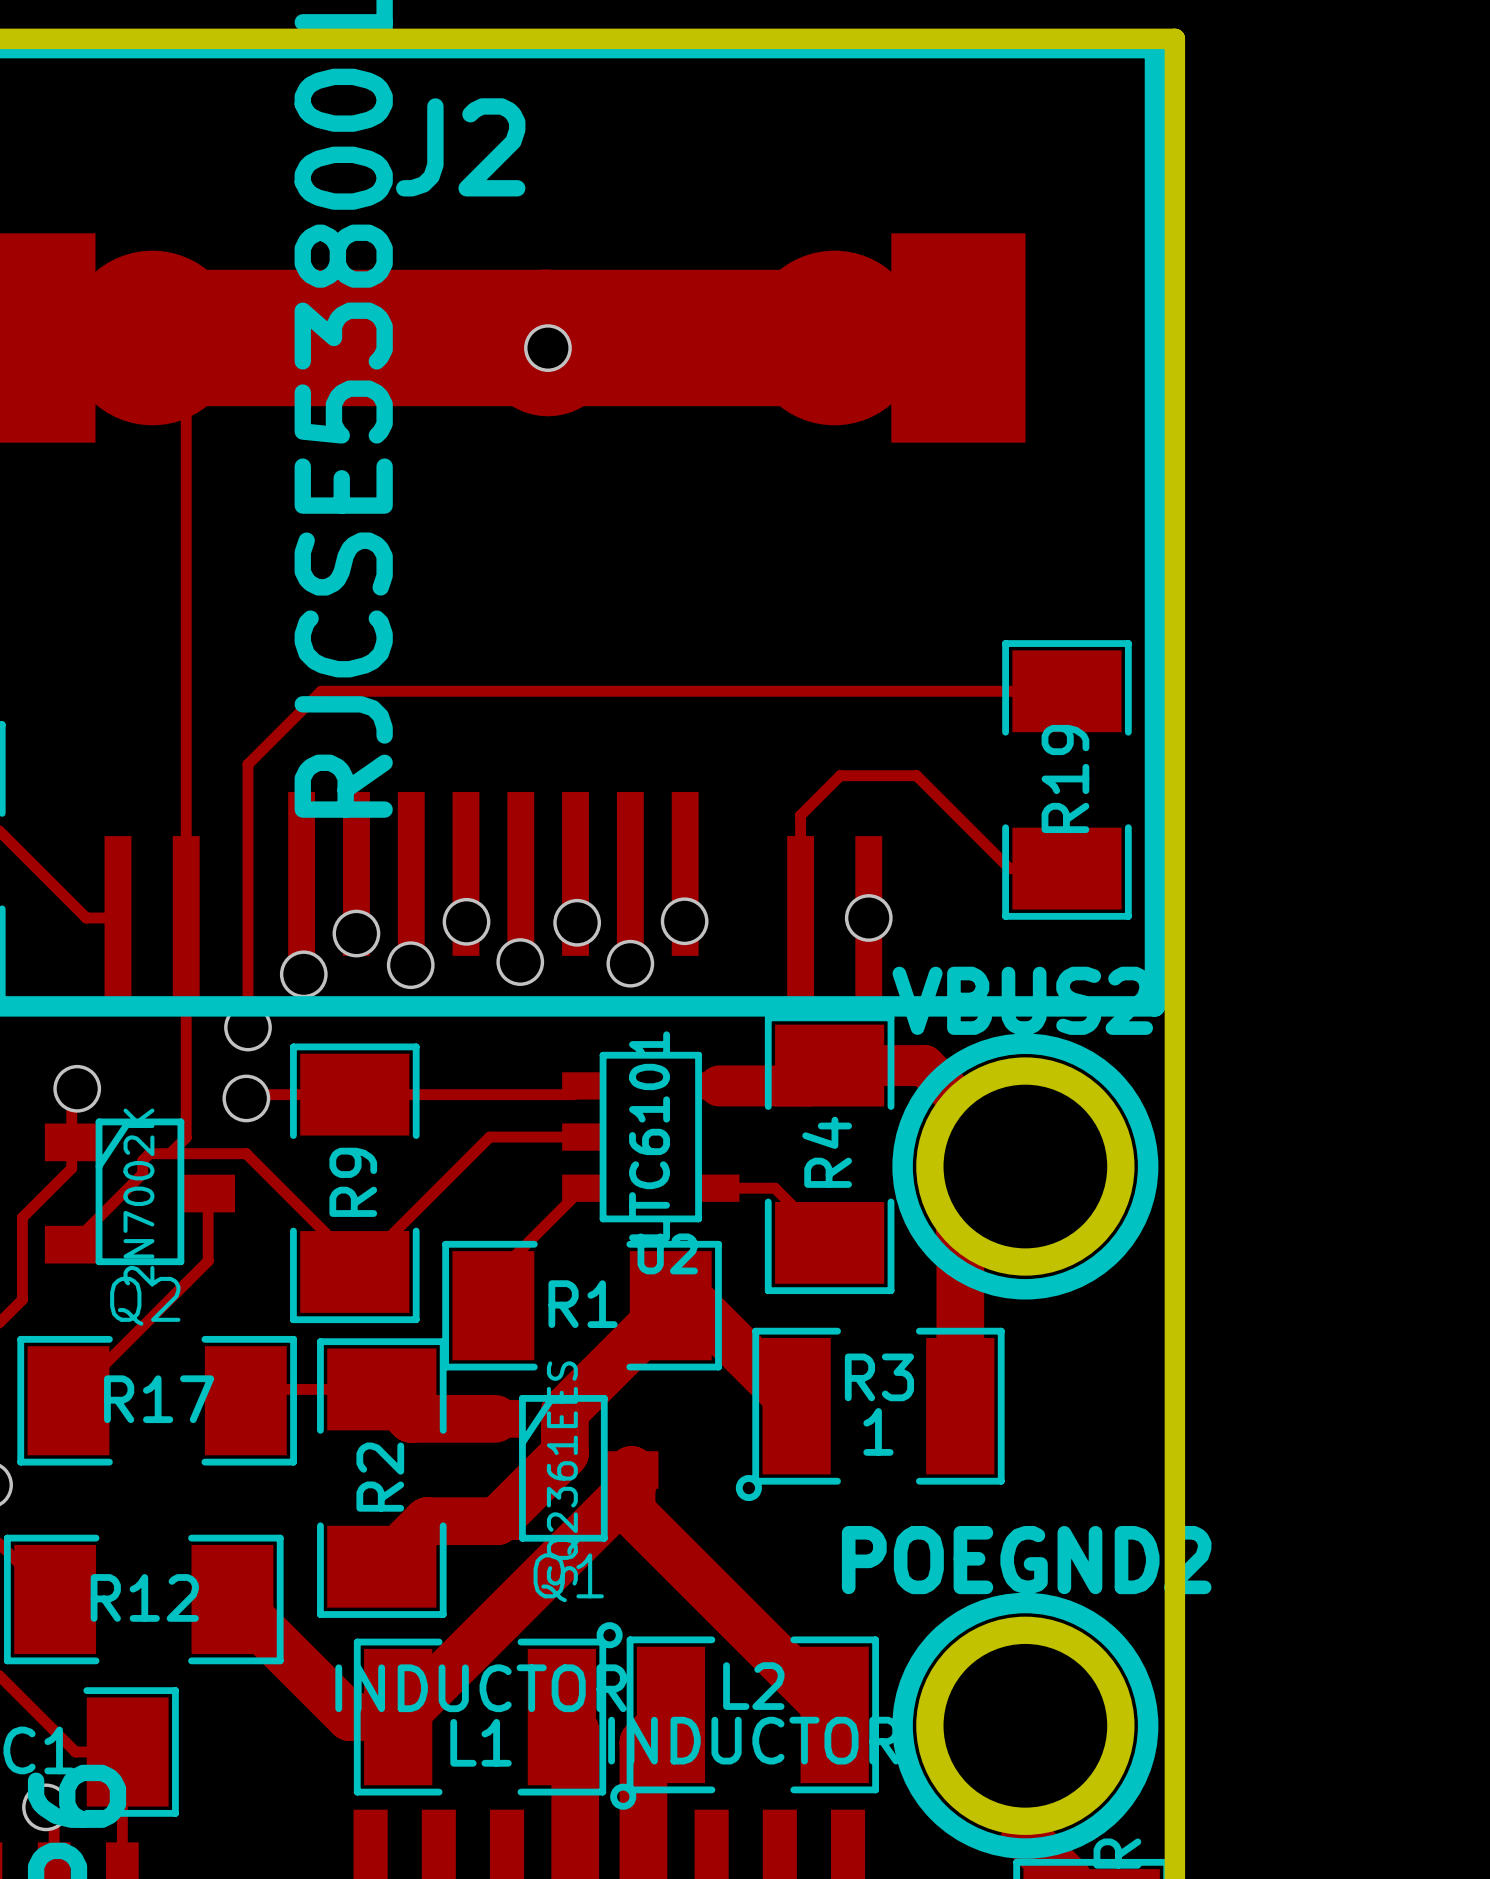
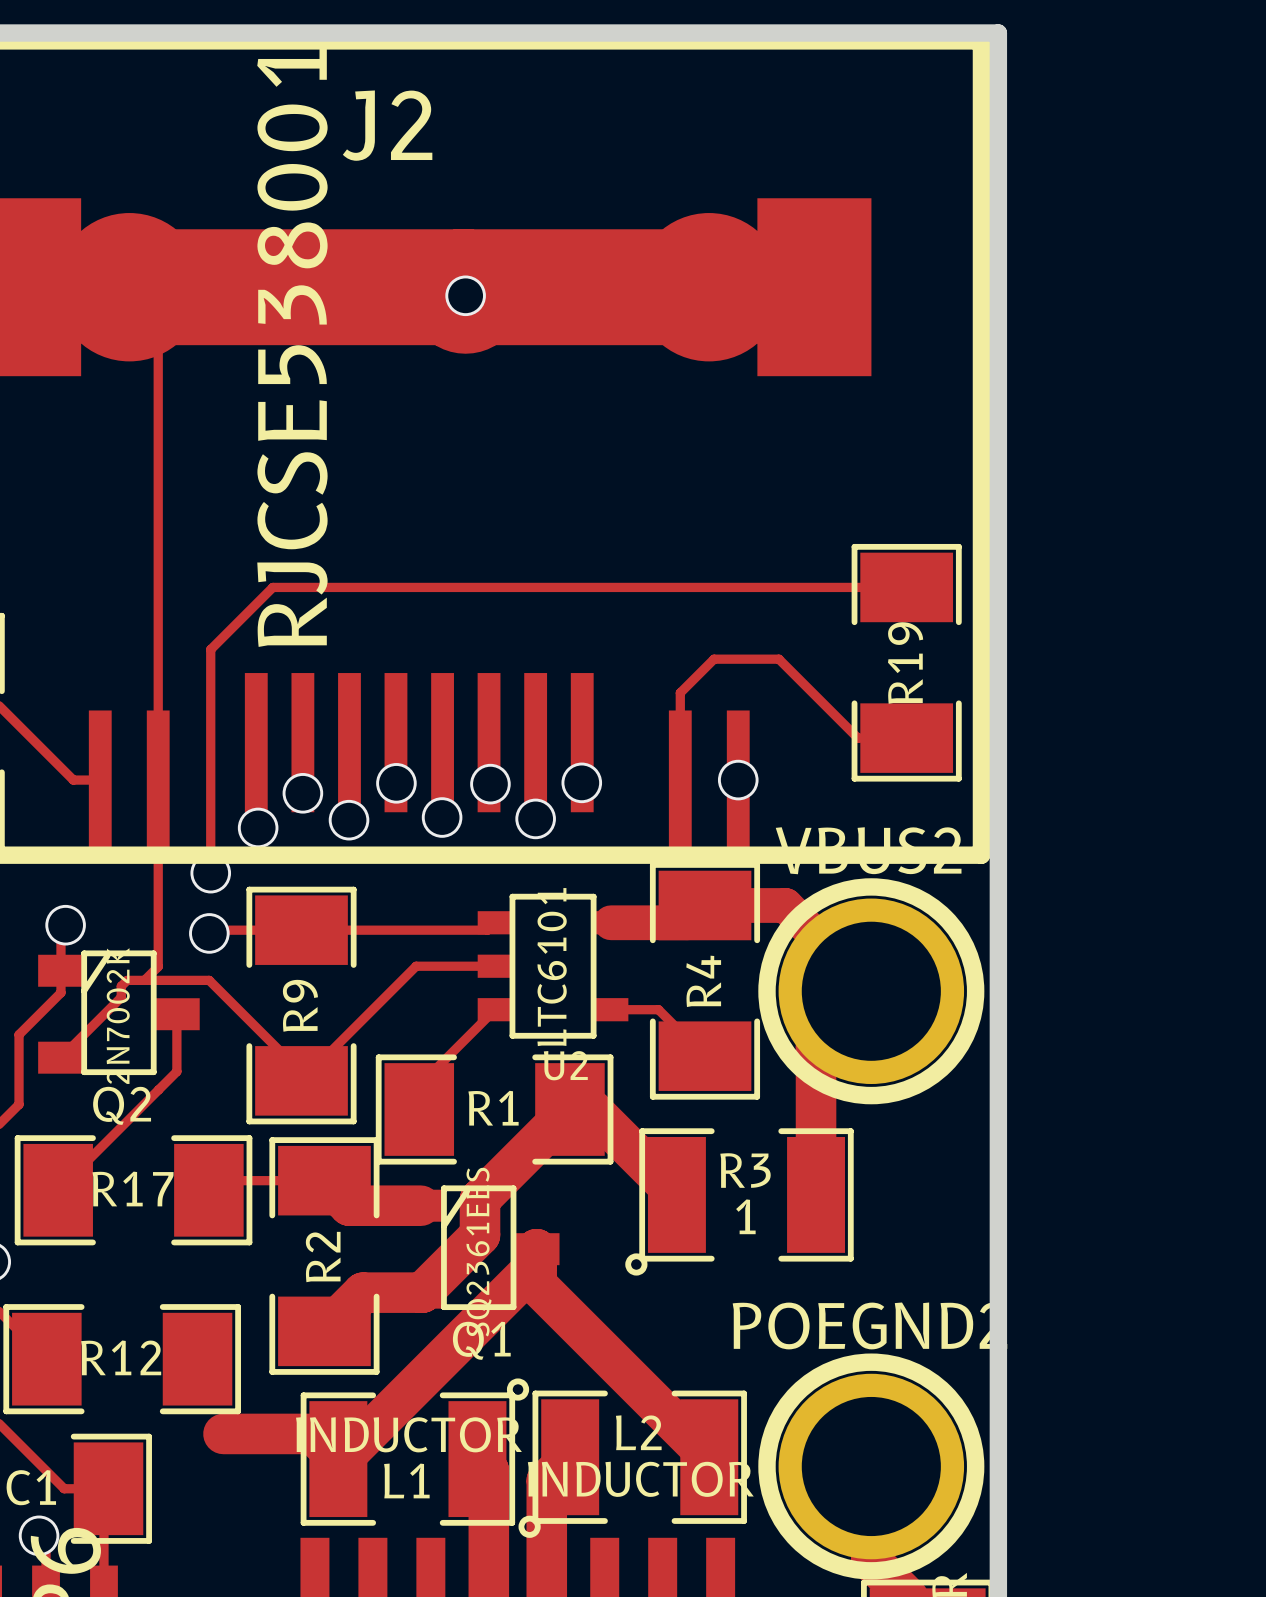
track: (232, 1599) (350, 1717) (398, 1717) -> (223, 1433) (313, 1433) (338, 1459)

